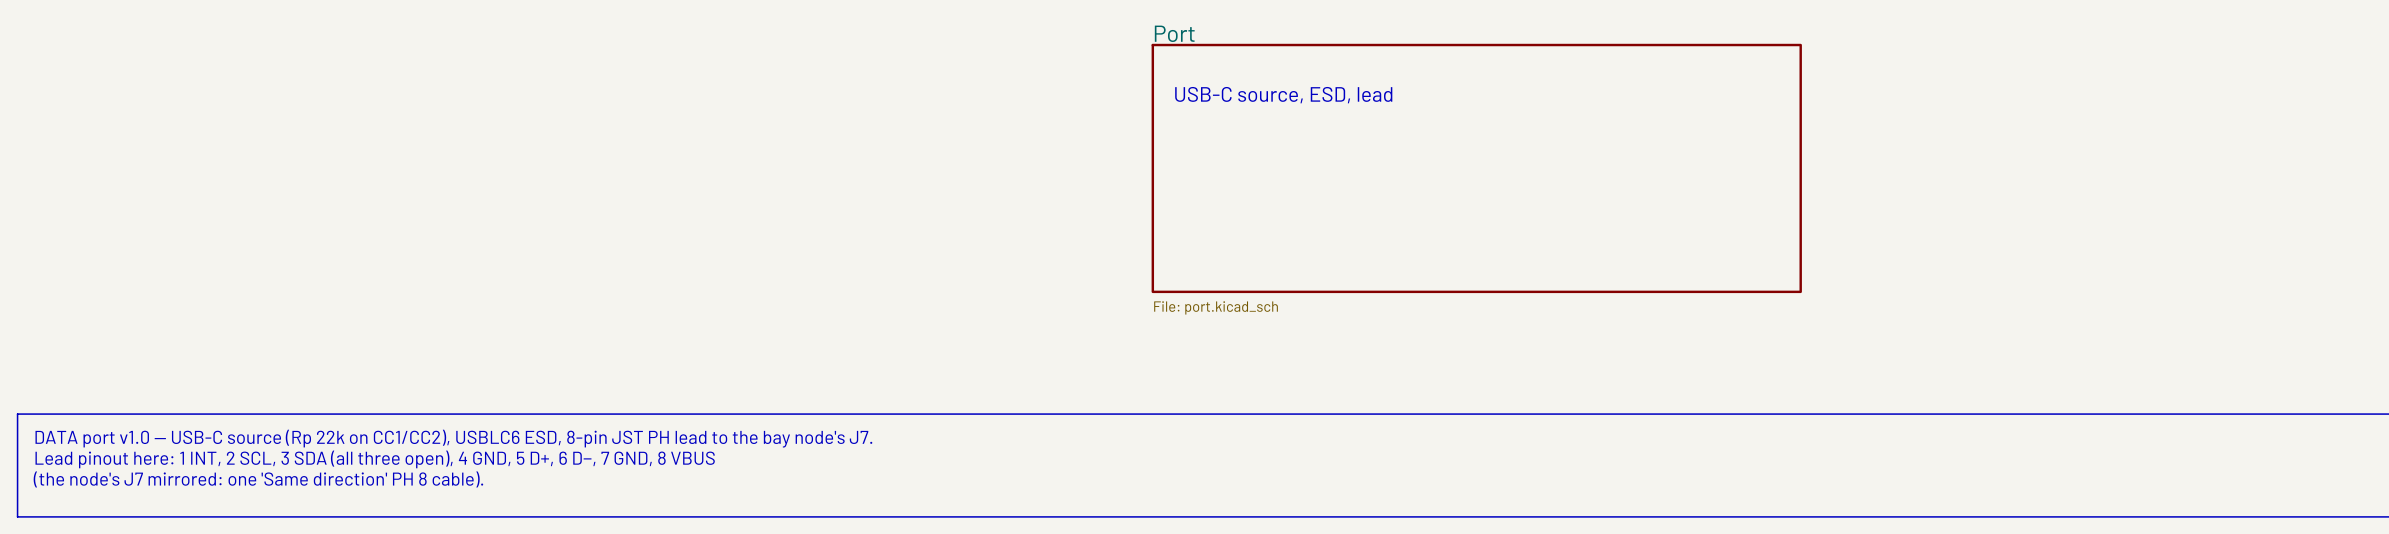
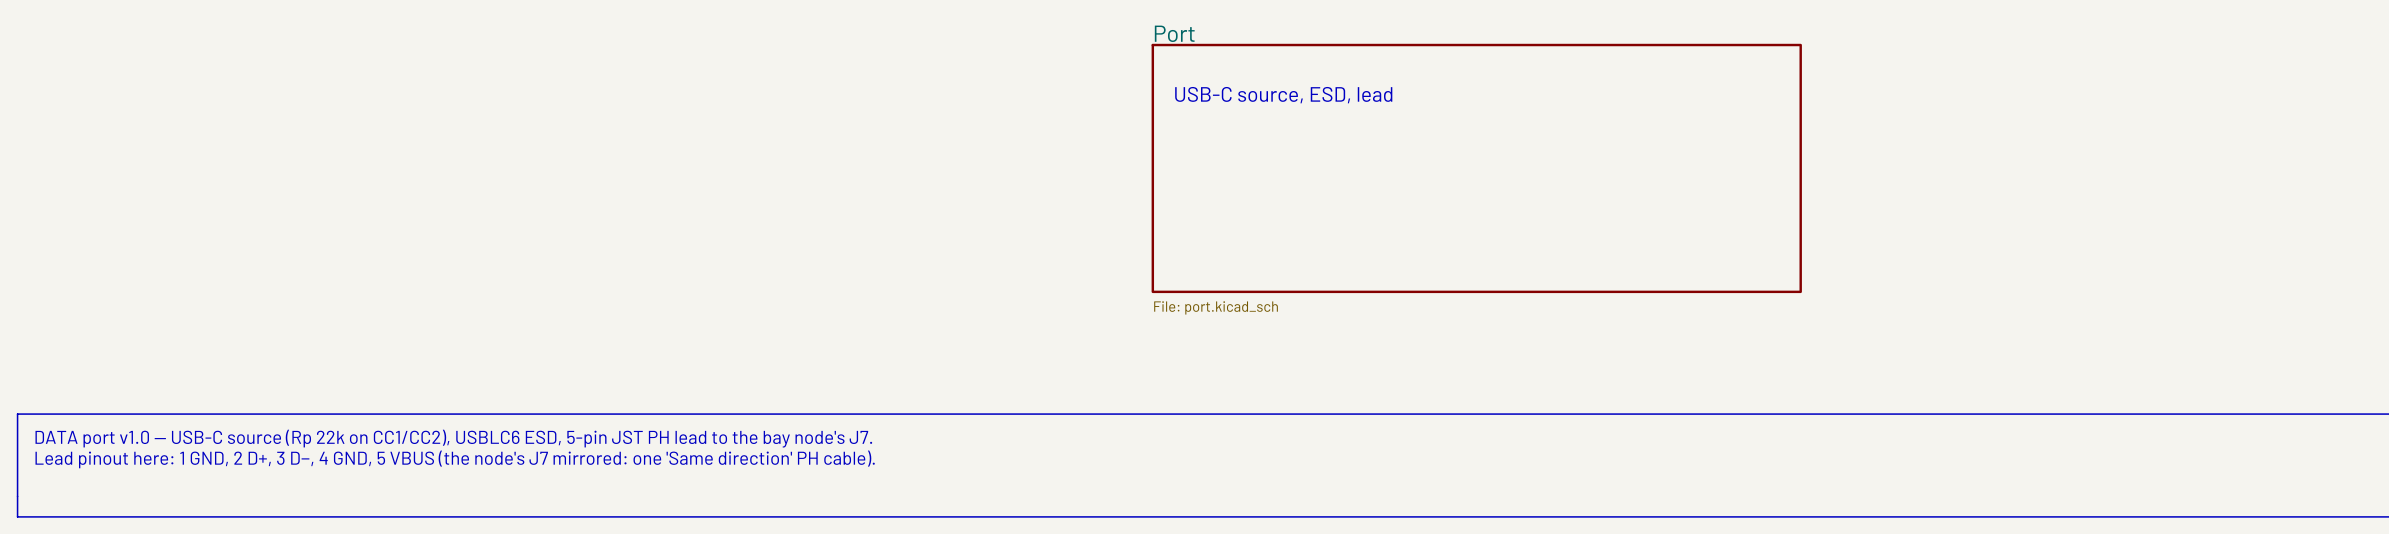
text: DATA port v1.0 — USB-C source (Rp 22k on CC1/CC2), USBLC6 ESD, 8-pin JST PH lead to the bay node's J7. (453, 438) -> DATA port v1.0 — USB-C source (Rp 22k on CC1/CC2), USBLC6 ESD, 5-pin JST PH lead to the bay node's J7. (453, 438)
text: Lead pinout here: 1 INT, 2 SCL, 3 SDA (all three open), 4 GND, 5 D+, 6 D−, 7 GND, 8 VBUS (375, 459) -> Lead pinout here: 1 GND, 2 D+, 3 D−, 4 GND, 5 VBUS (the node's J7 mirrored: one 'Same direction' PH cable). (455, 459)
text: (the node's J7 mirrored: one 'Same direction' PH 8 cable). (258, 479) -> none

